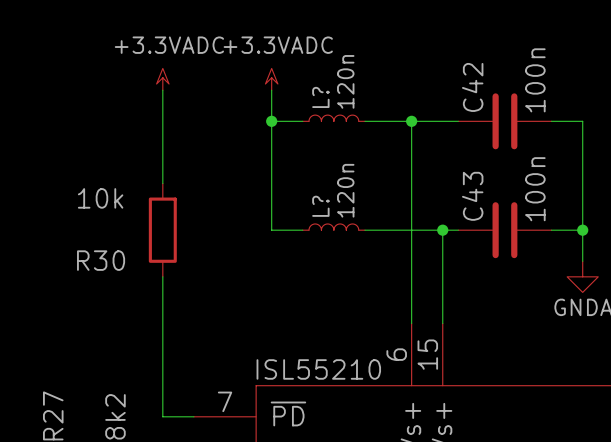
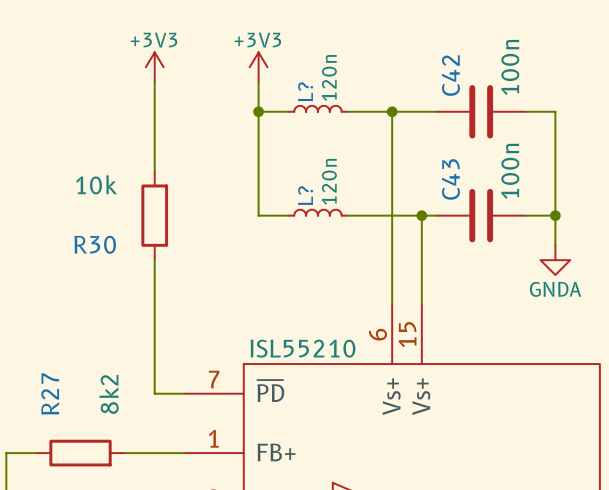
power symbol: +3.3VADC (162, 79) -> +3V3 (154, 67)
power symbol: +3.3VADC (271, 79) -> +3V3 (258, 67)

